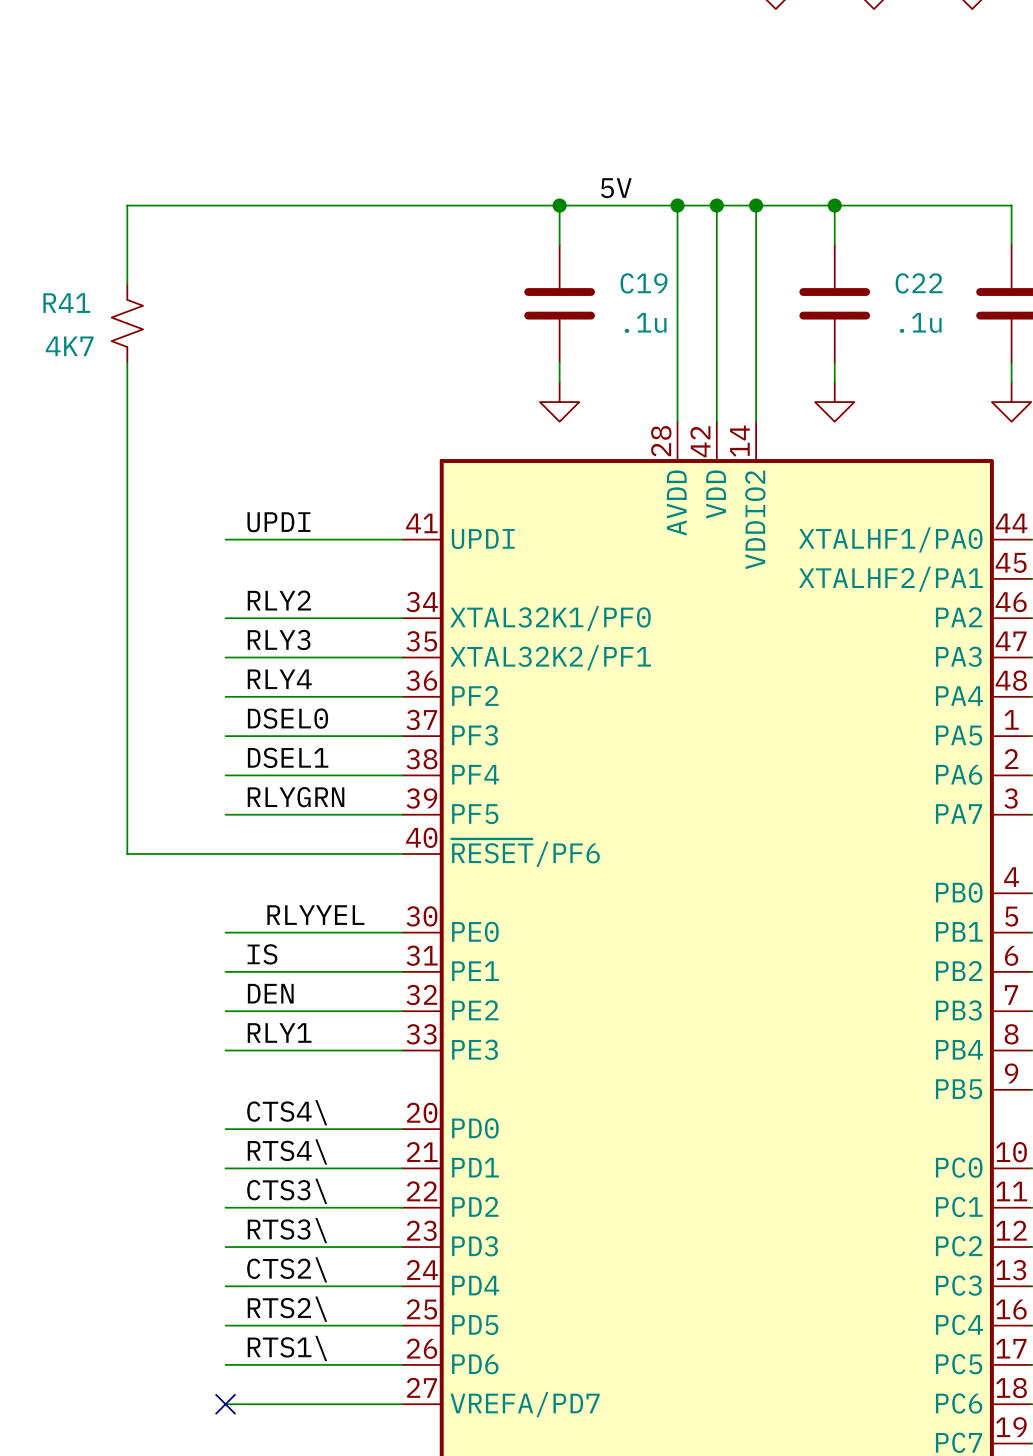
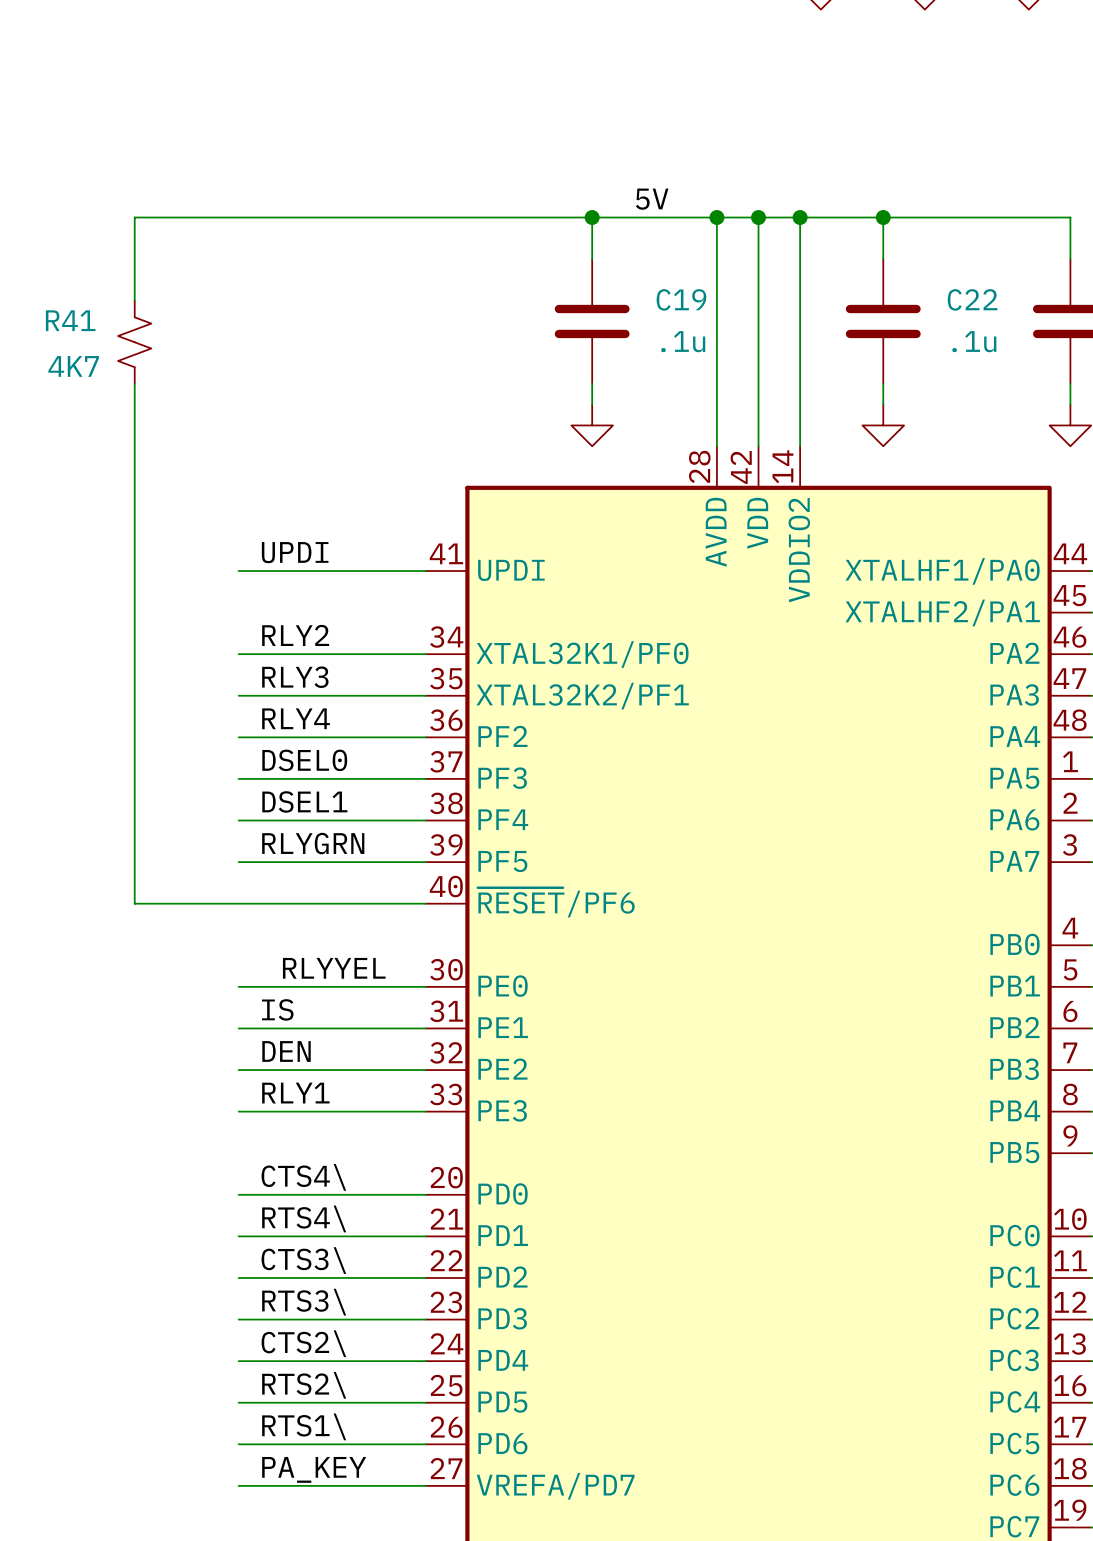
label: none -> PA_KEY (314, 1469)
no-connect mark: (225, 1404) -> none

